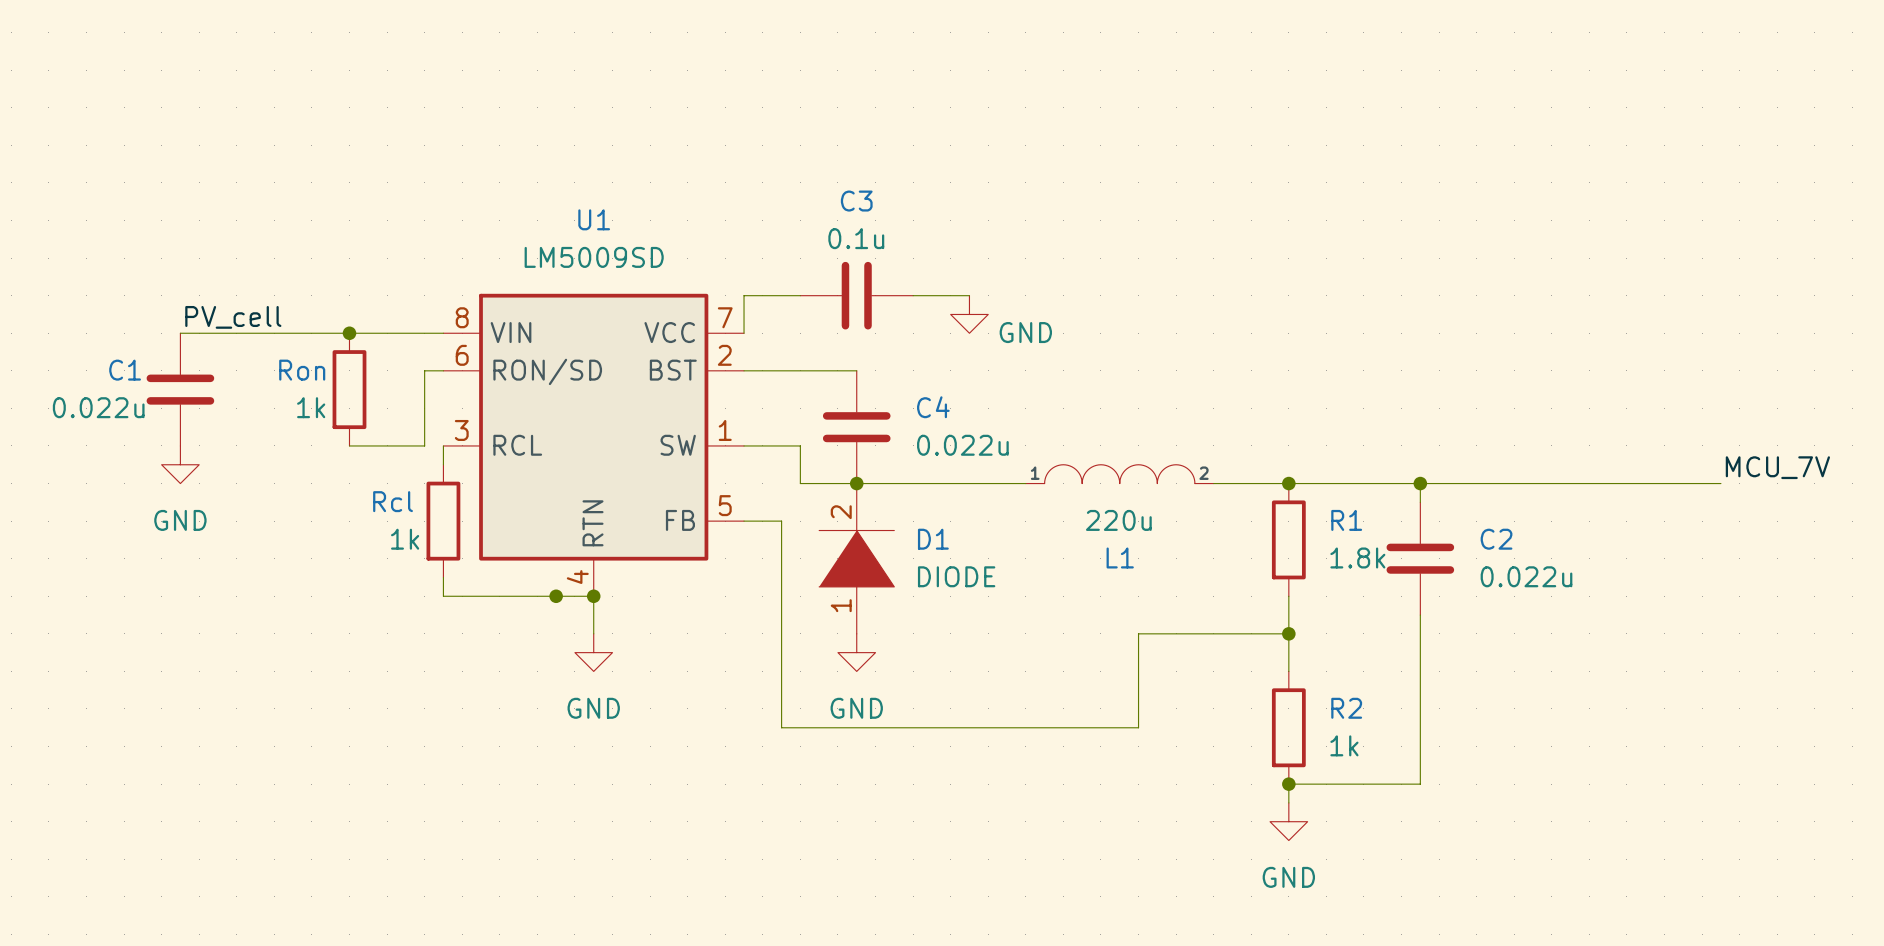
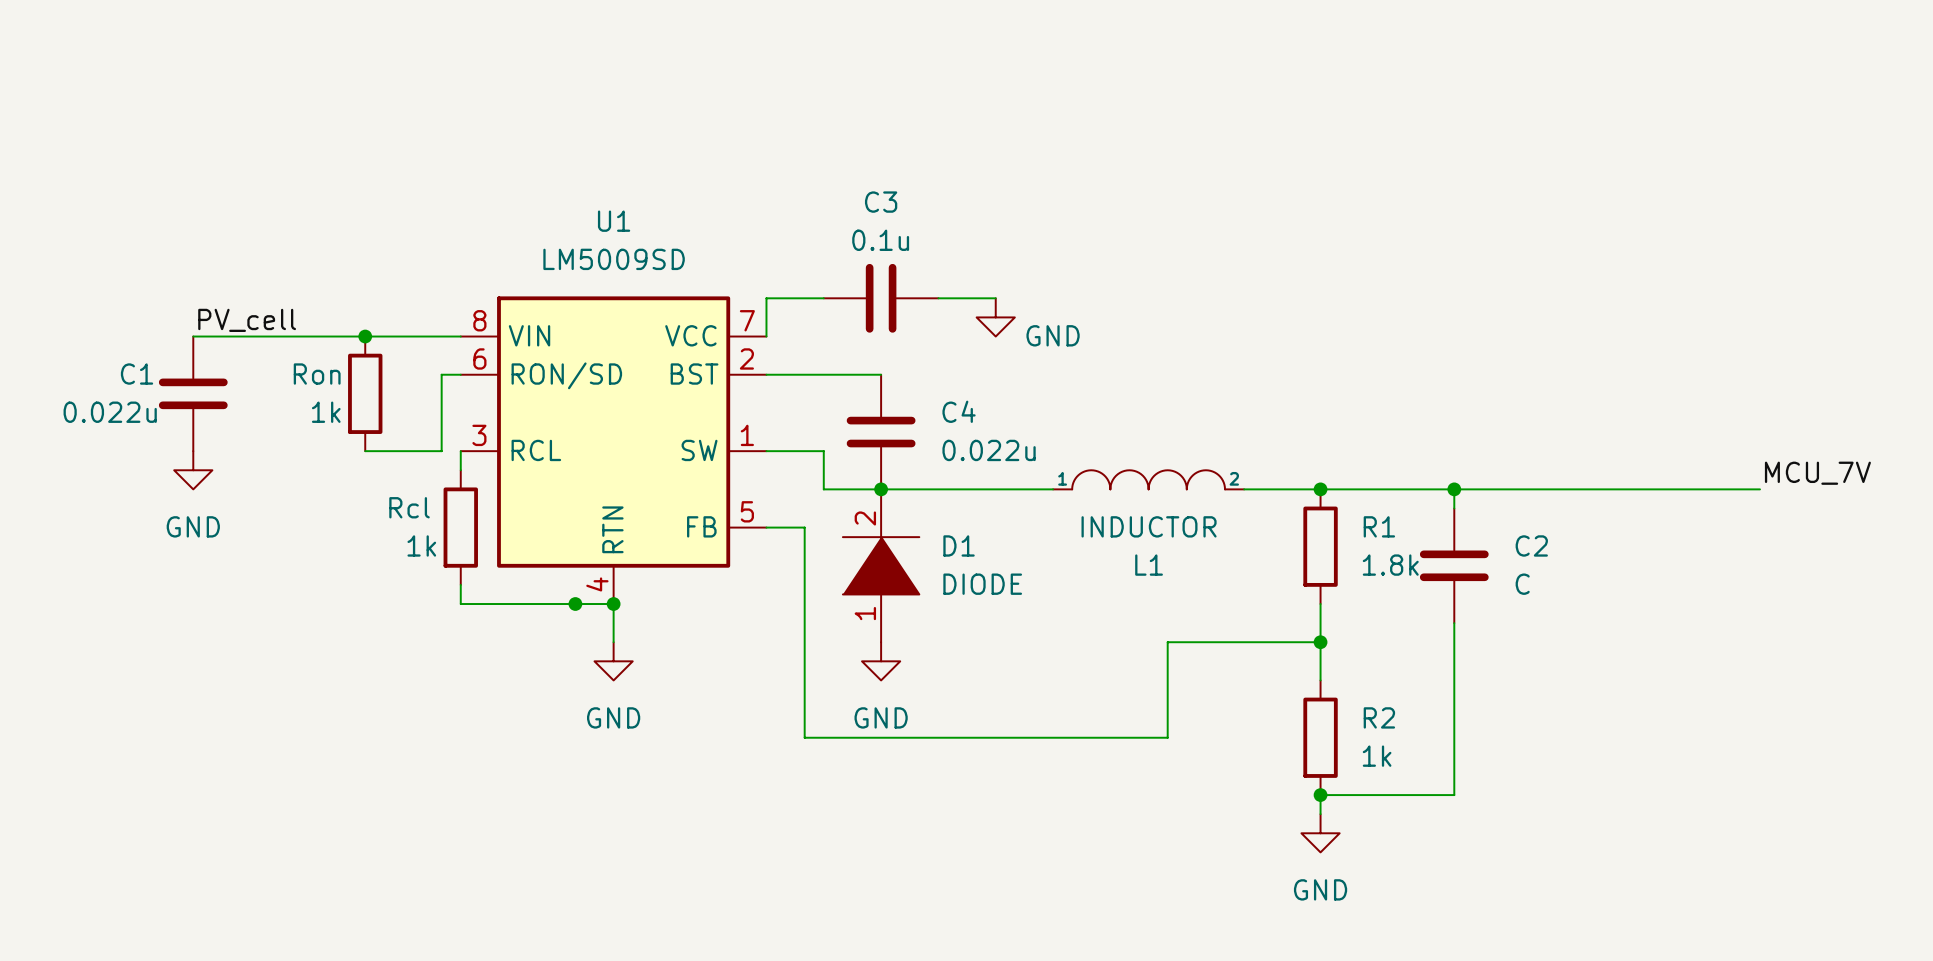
L1 value: 220u (1118, 520) -> INDUCTOR (1149, 526)
C2 value: 0.022u (1526, 576) -> C (1522, 584)

